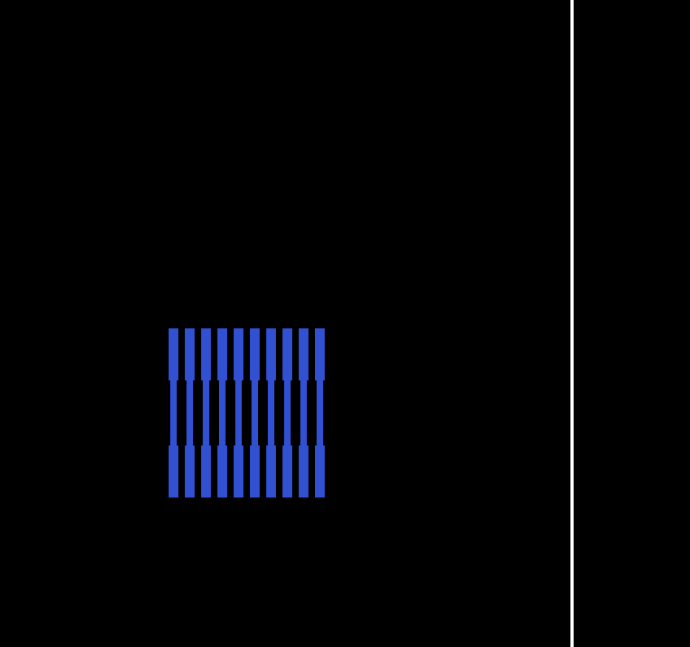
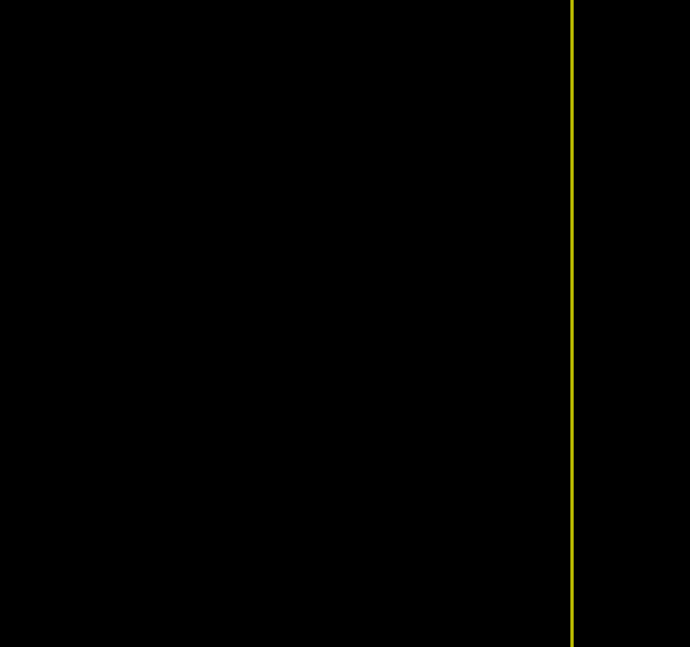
bottom track: (173, 354) (173, 471) -> none
bottom track: (189, 354) (189, 471) -> none
bottom track: (206, 354) (206, 471) -> none
bottom track: (222, 354) (222, 471) -> none
bottom track: (238, 354) (238, 471) -> none
bottom track: (254, 354) (254, 471) -> none
bottom track: (271, 354) (271, 471) -> none
bottom track: (287, 354) (287, 471) -> none
bottom track: (303, 354) (303, 471) -> none
bottom track: (319, 354) (319, 471) -> none
part: (246, 412) -> none

